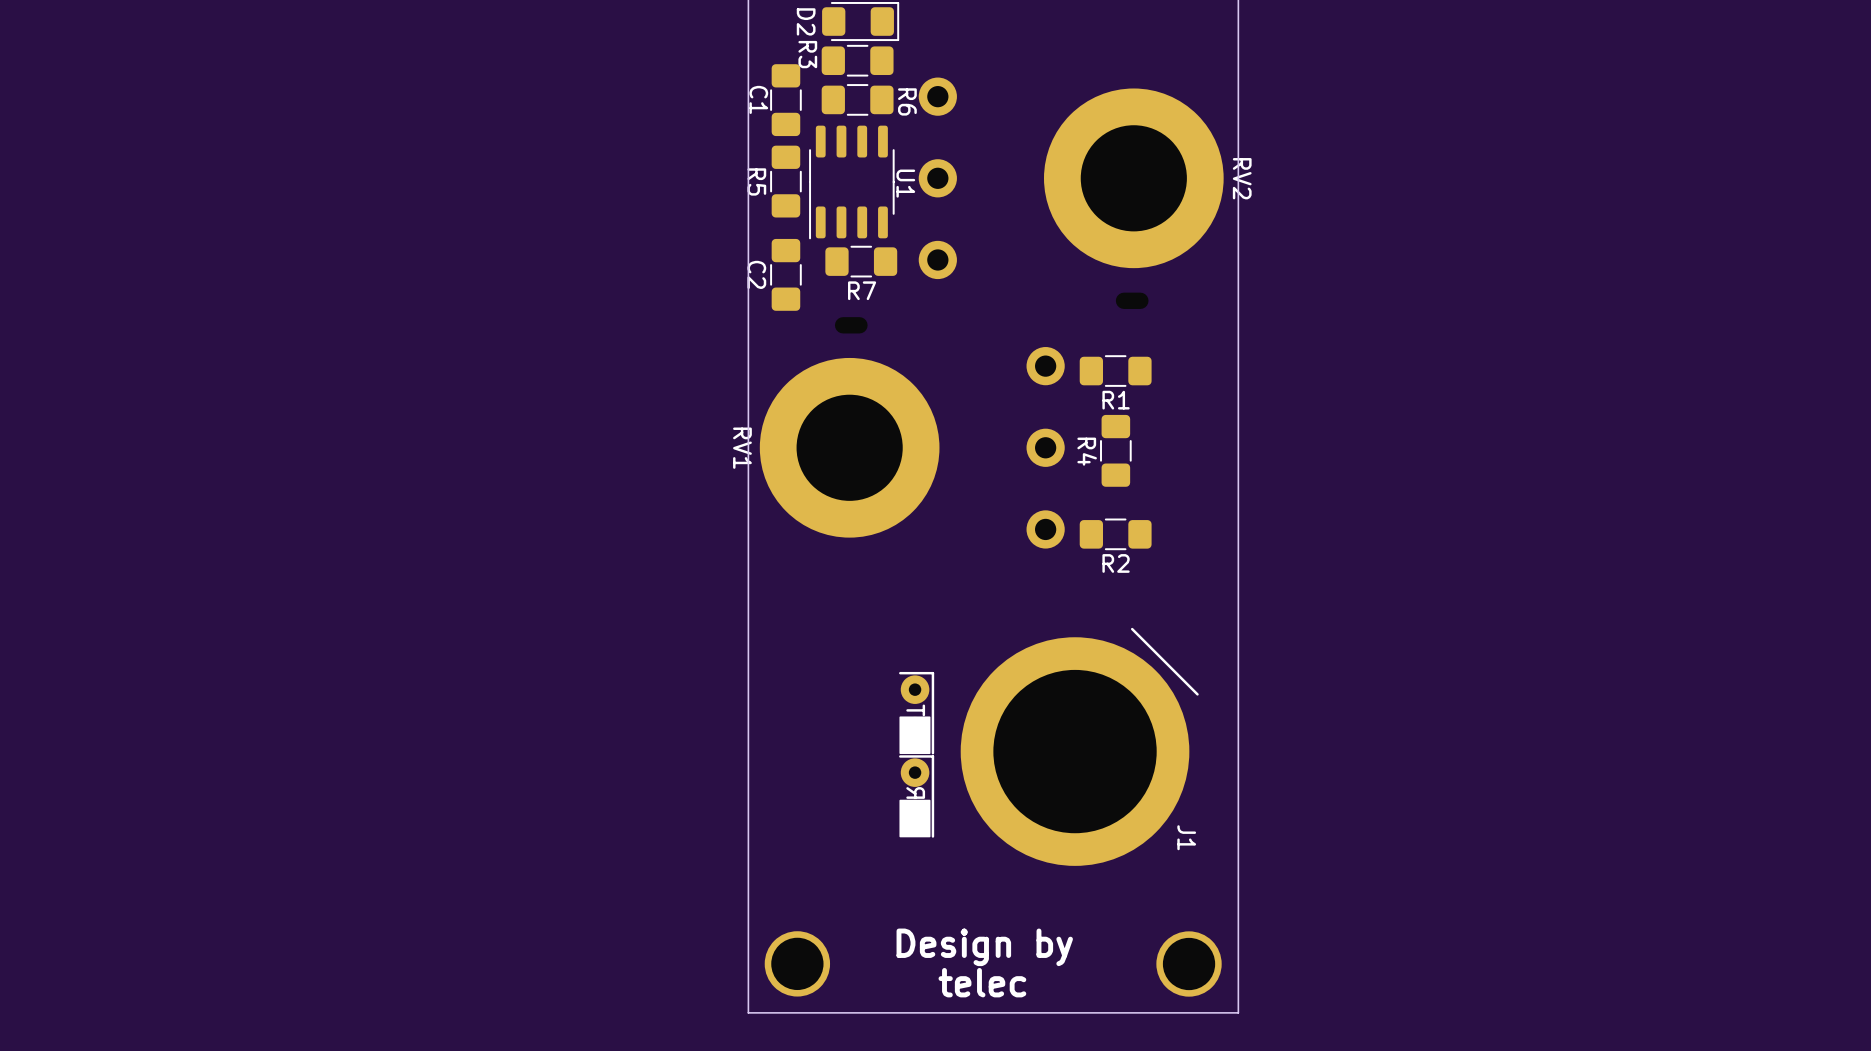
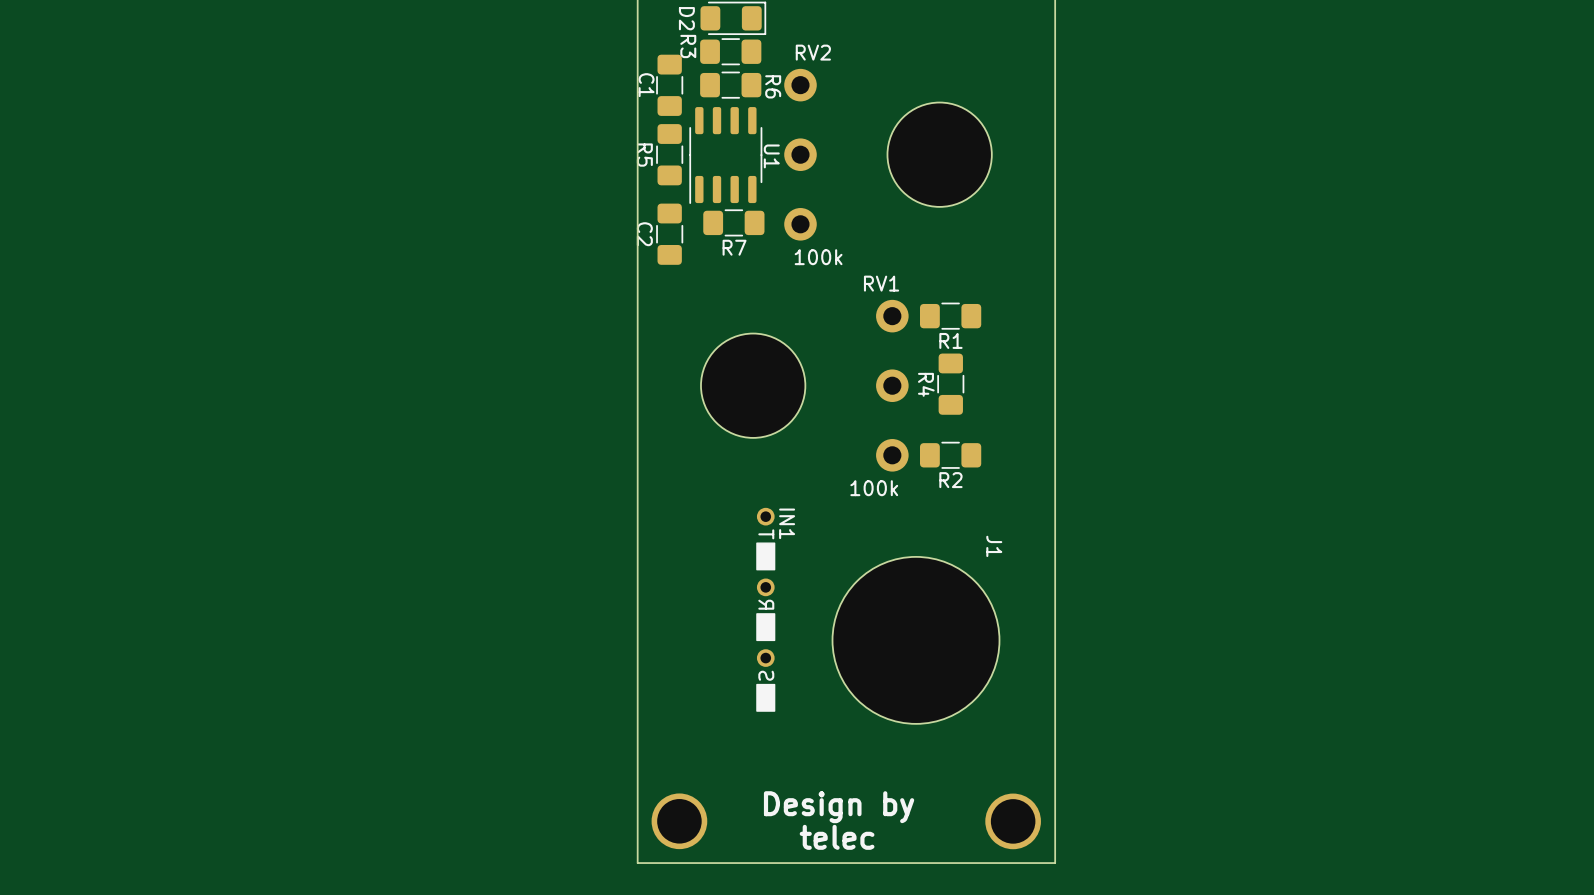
RV2 footprint: [918, 77, 1224, 309] -> [784, 68, 992, 241]
RV2 name position: RV2 (1242, 178) -> RV2 (813, 52)
RV2 value: none -> 100k (818, 257)
RV1 footprint: [759, 317, 1065, 549] -> [700, 299, 909, 472]
RV1 name position: RV1 (742, 448) -> RV1 (881, 283)
RV1 value: none -> 100k (874, 488)
J1 value: none -> IN1 (787, 523)
J1 footprint: [899, 627, 1199, 866] -> [756, 507, 1000, 724]
J1 name position: J1 (1186, 837) -> J1 (994, 546)

